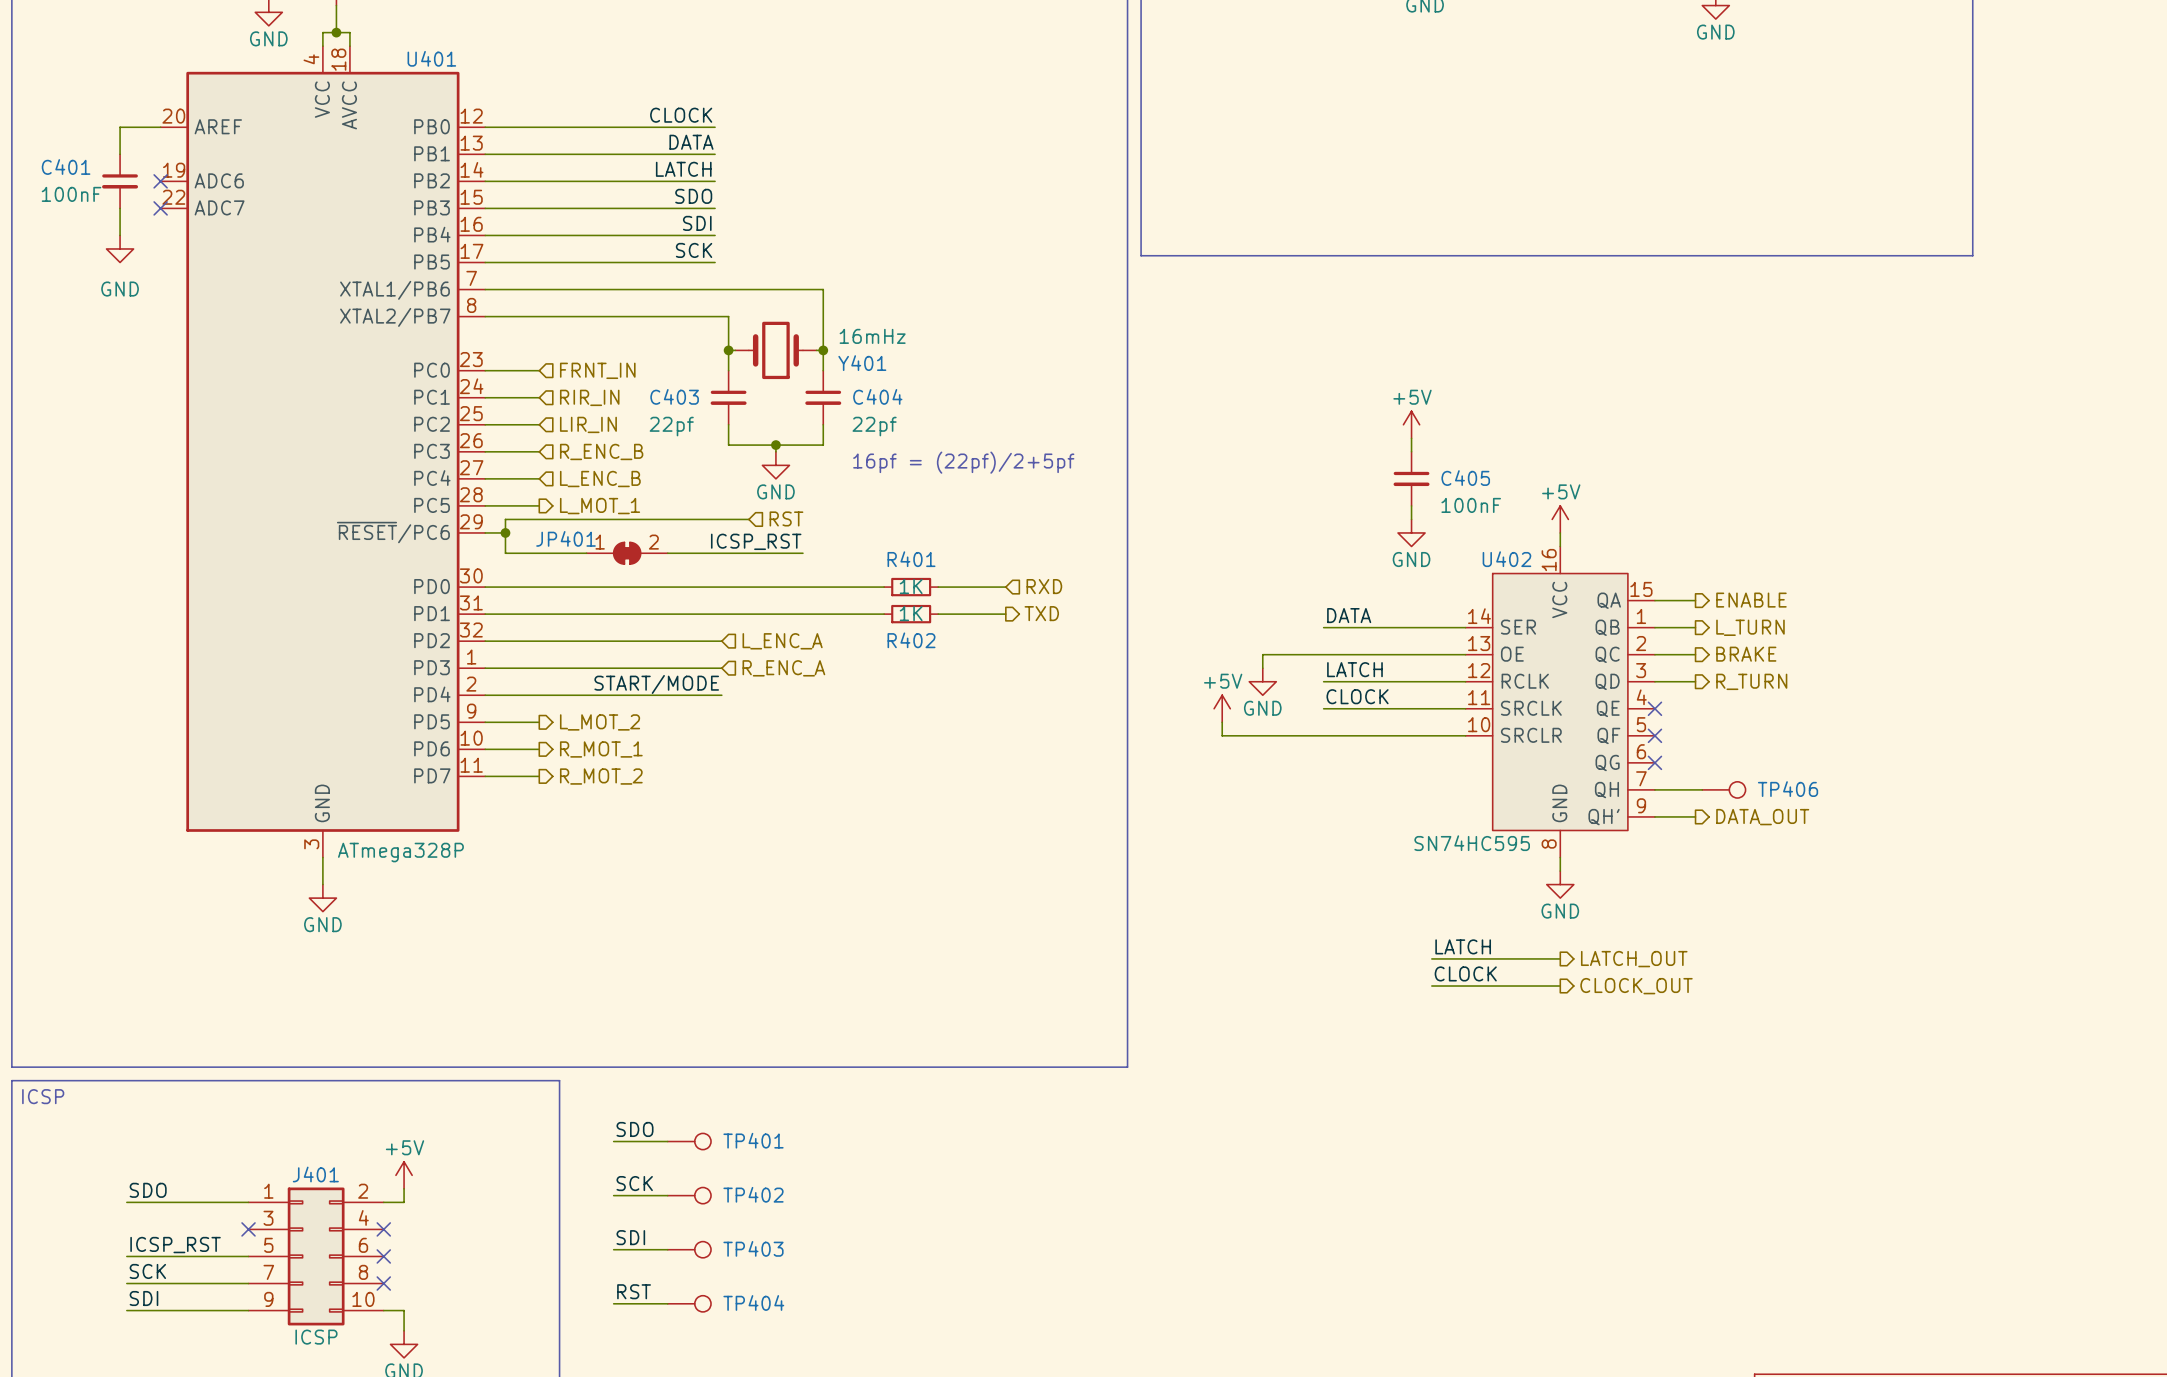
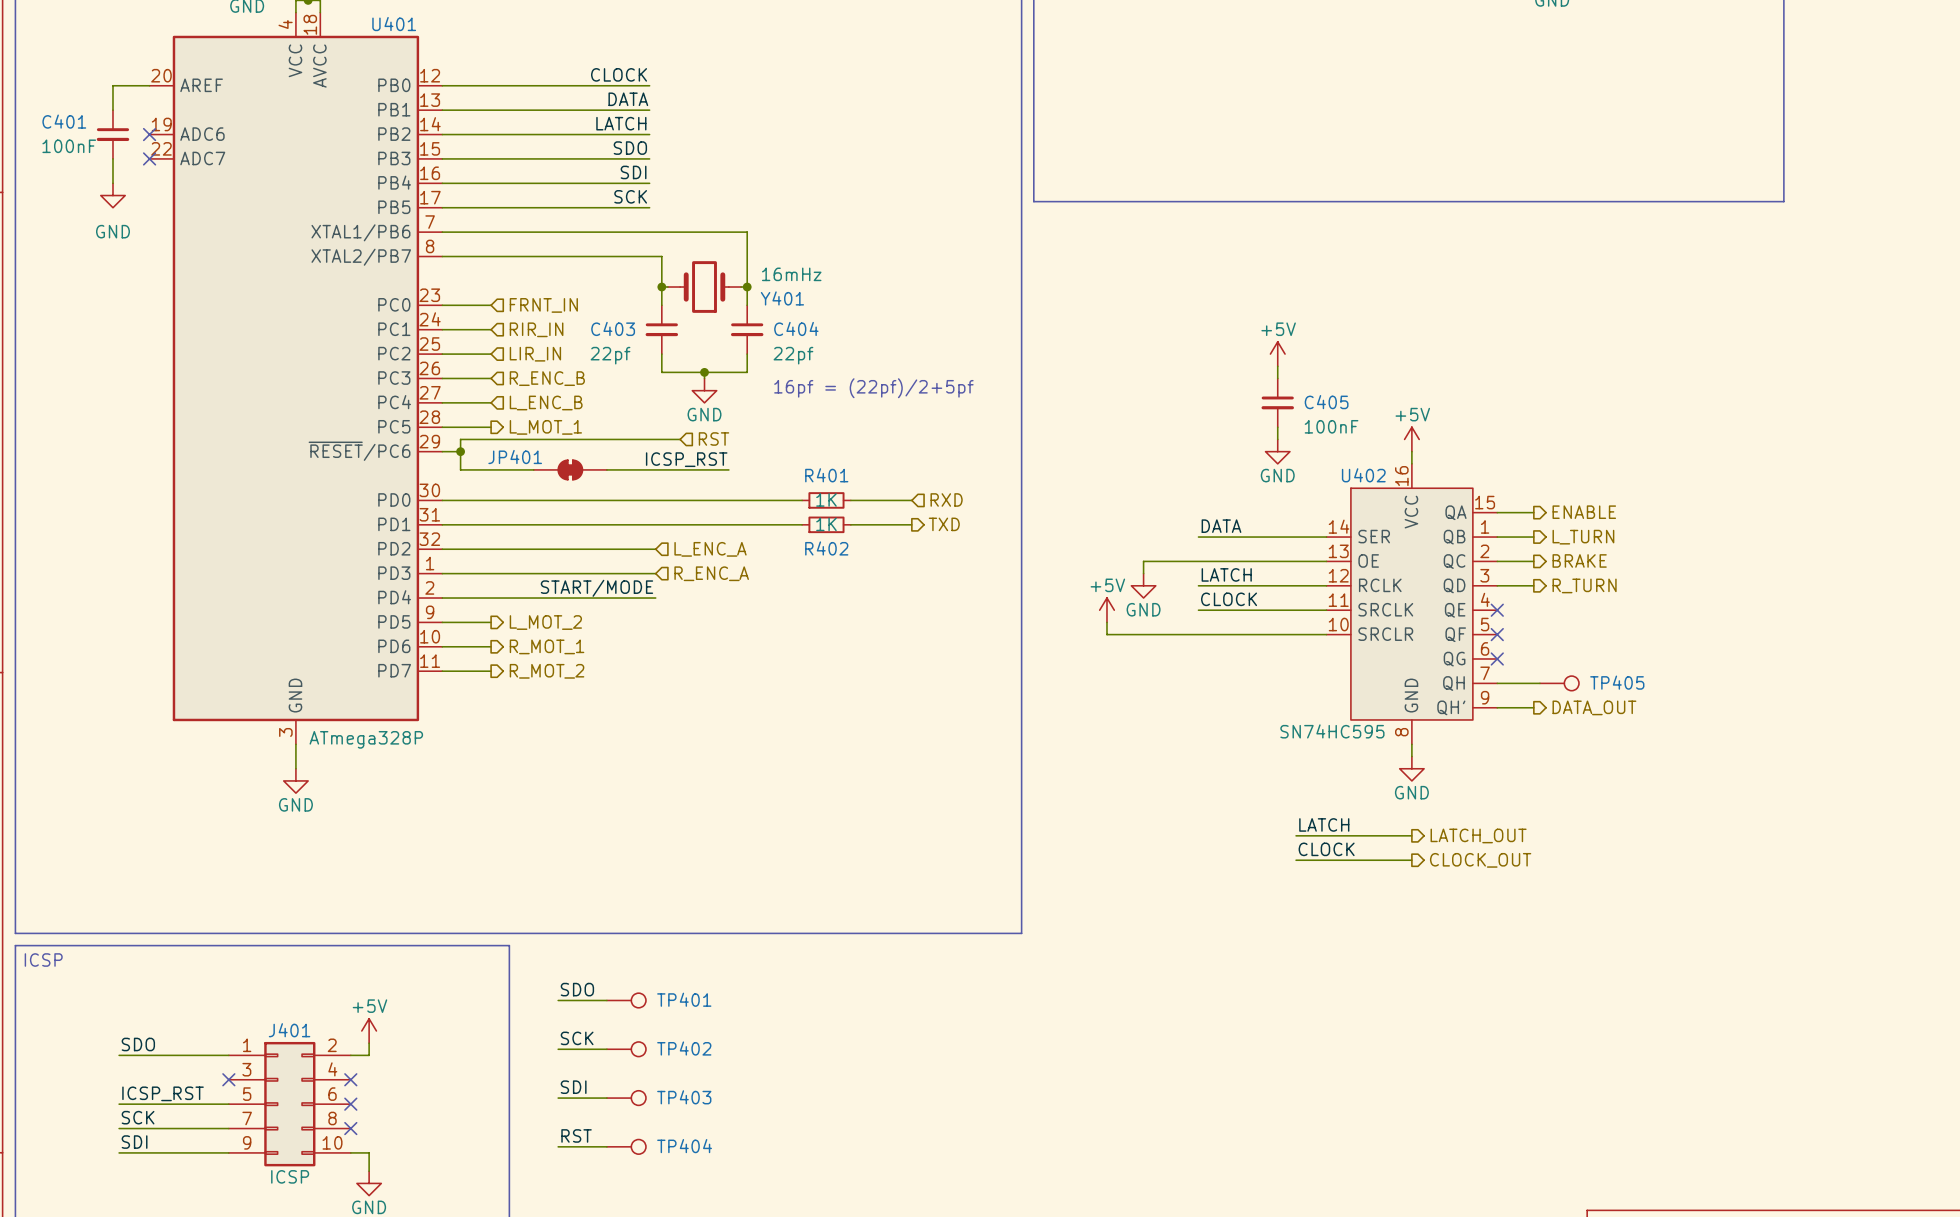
JP401 pin number: 1 (600, 542) -> none
JP401 pin number: 2 (653, 542) -> none
TP406 name: TP406 (1788, 789) -> TP405 (1617, 682)

